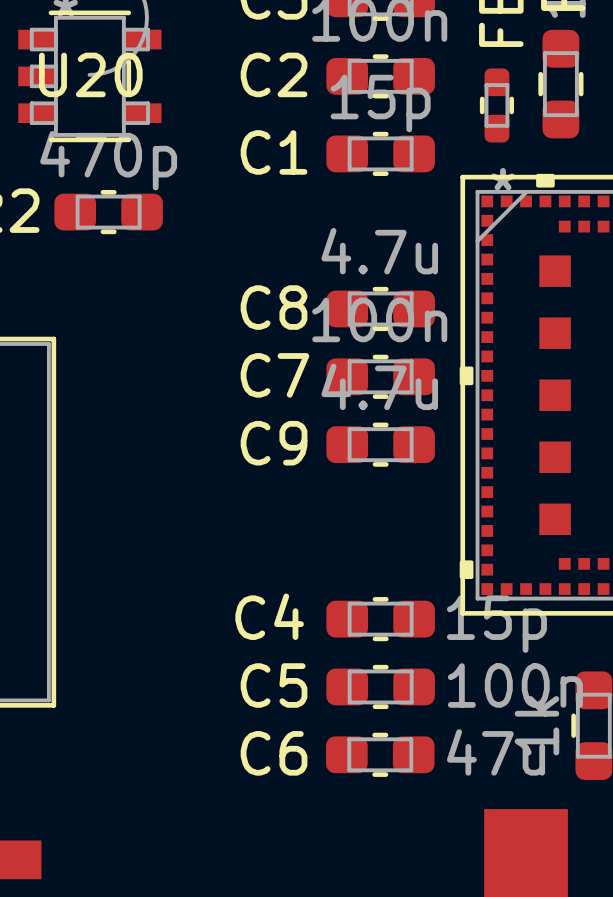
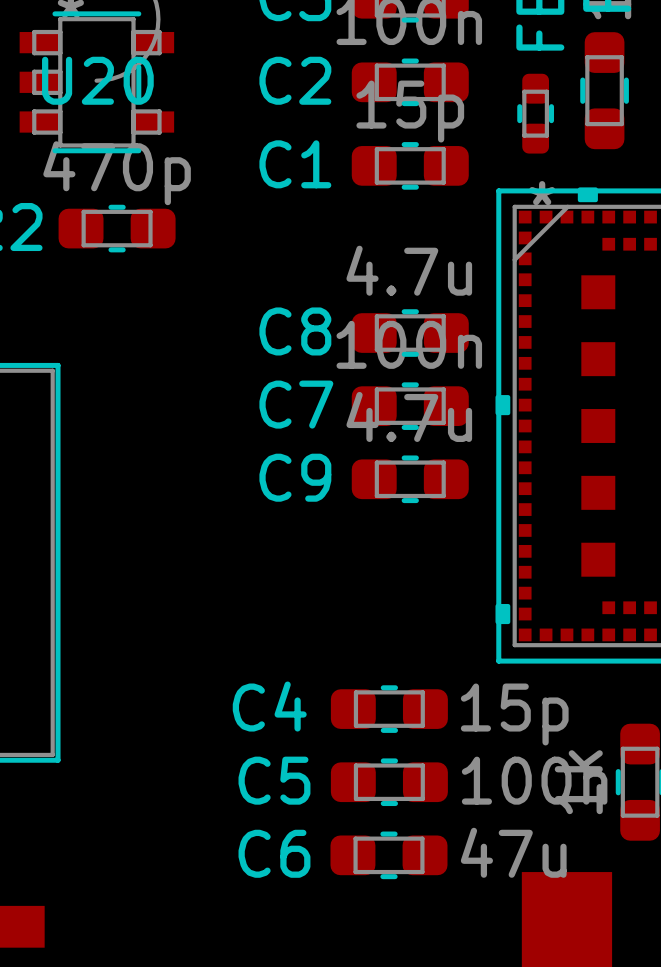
C4 position: (380, 619) -> (389, 709)
C5 position: (380, 686) -> (389, 782)
C6 position: (380, 754) -> (388, 855)

